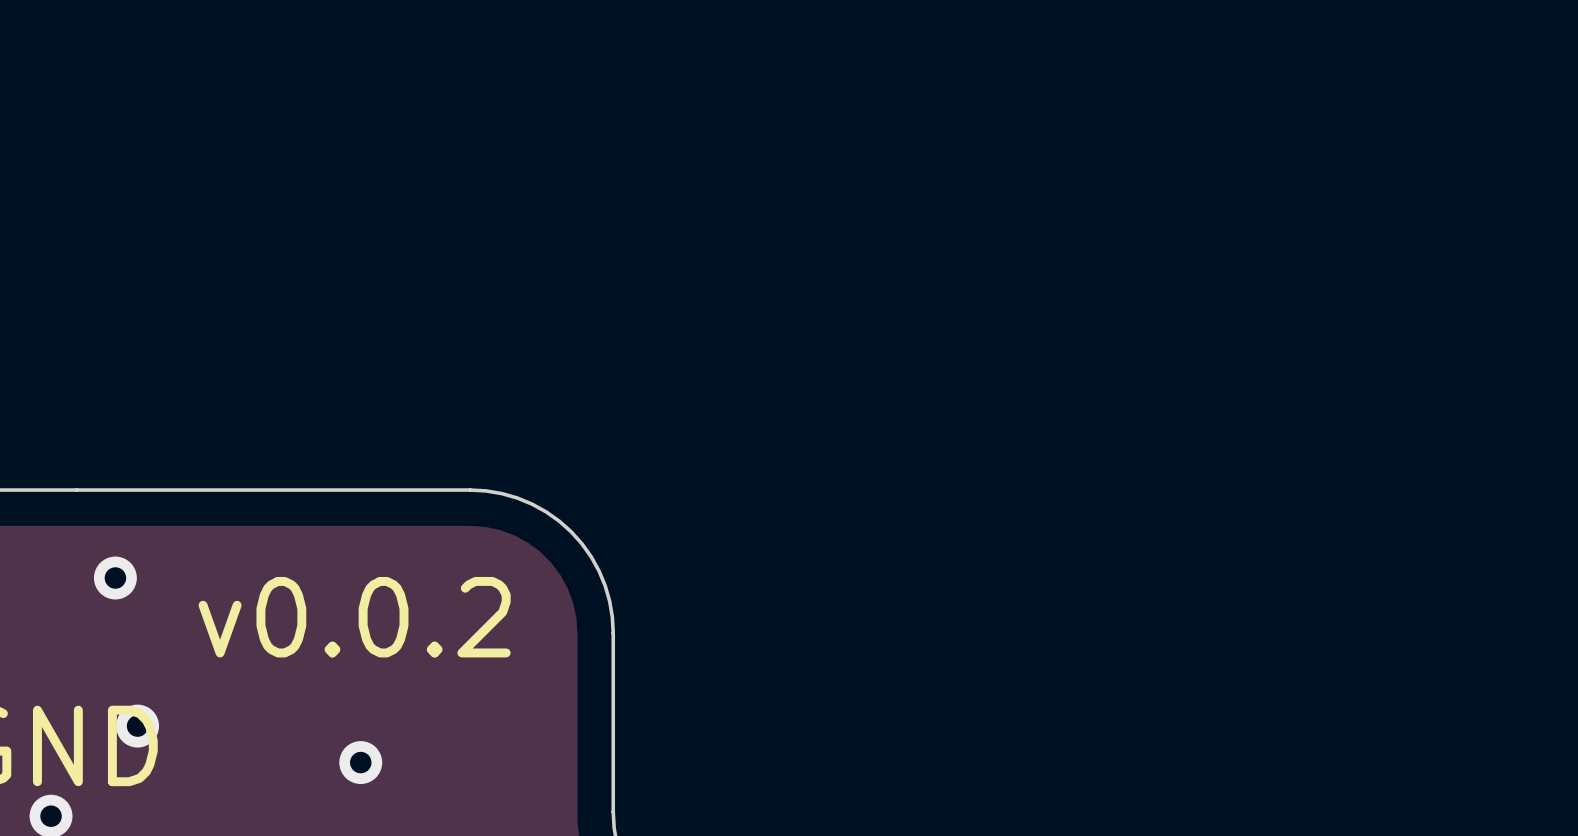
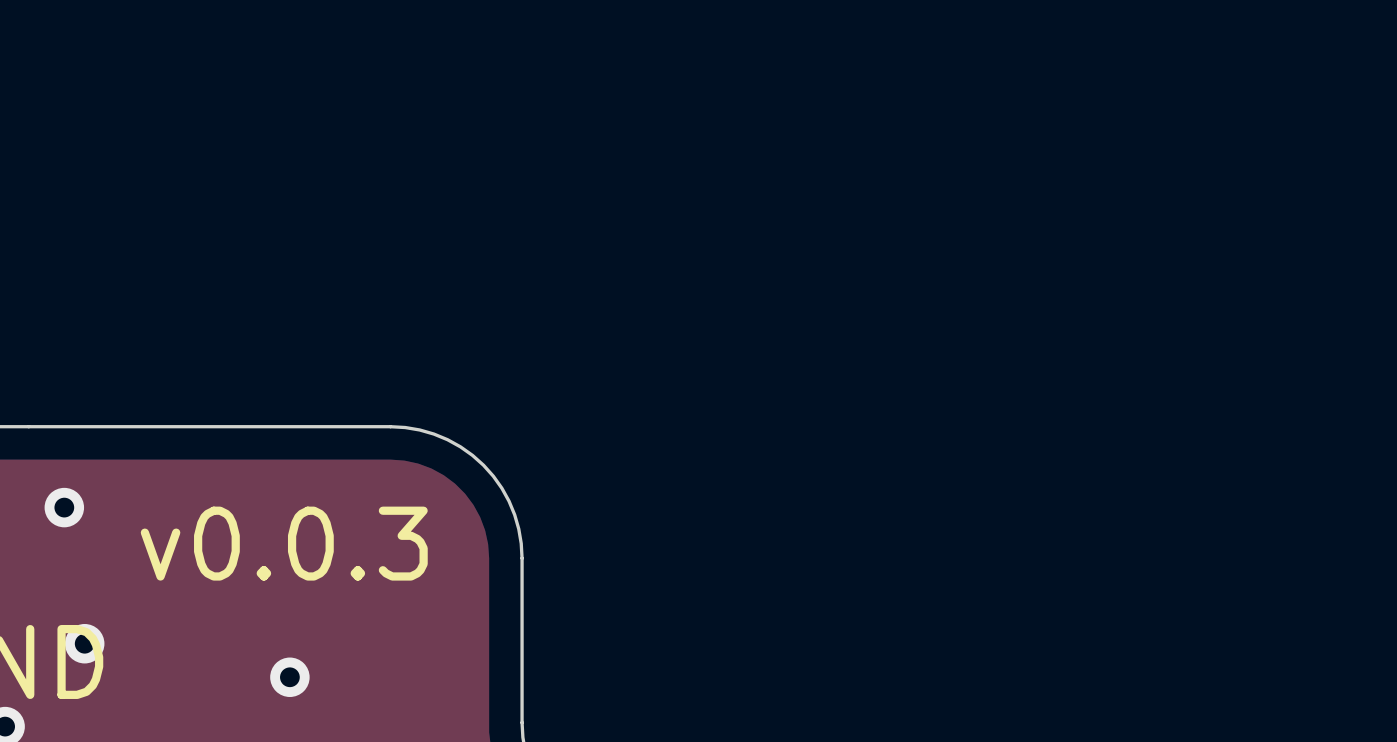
text: v0.0.2 (354, 617) -> v0.0.3 (284, 543)

